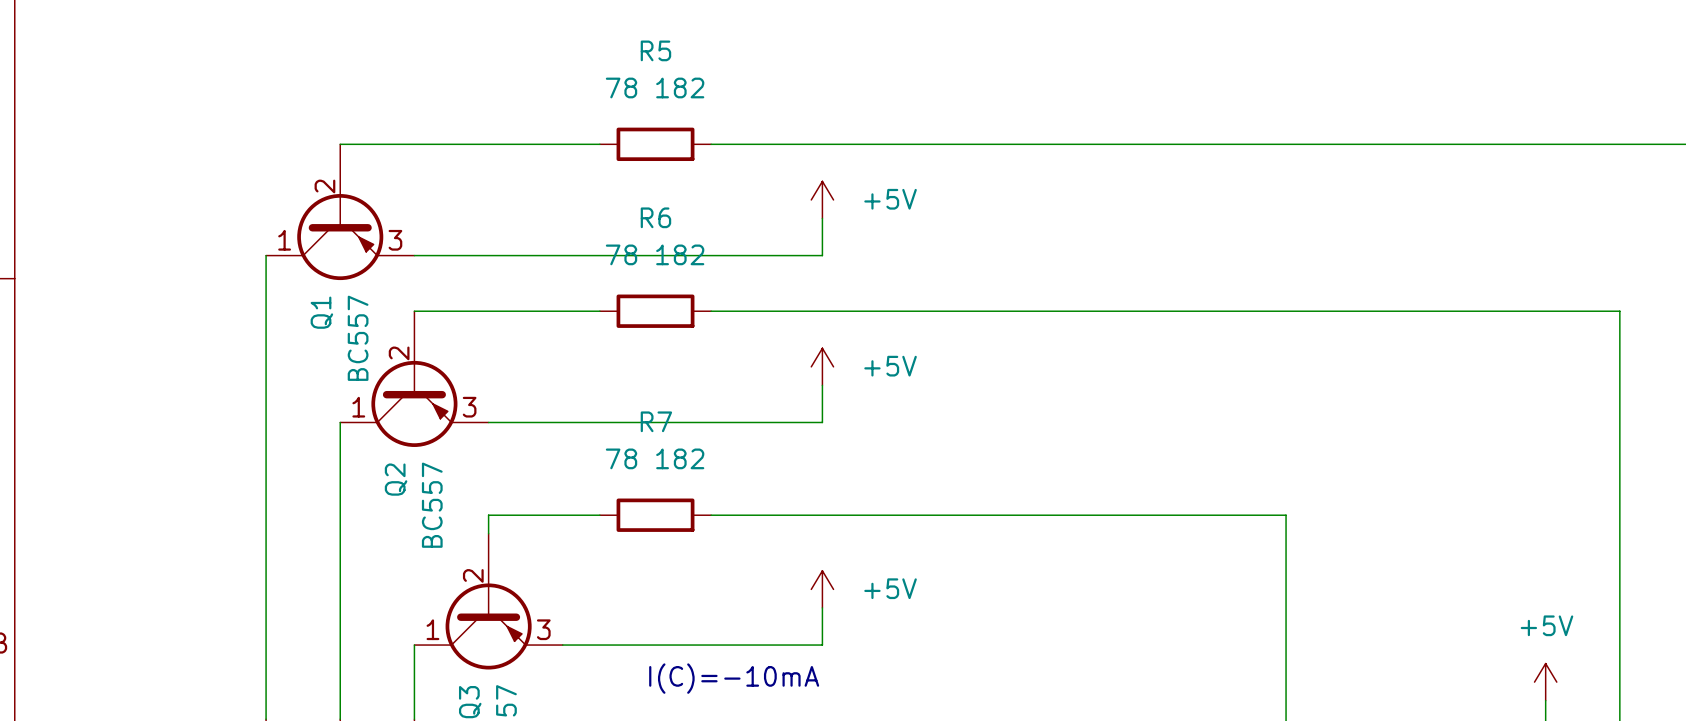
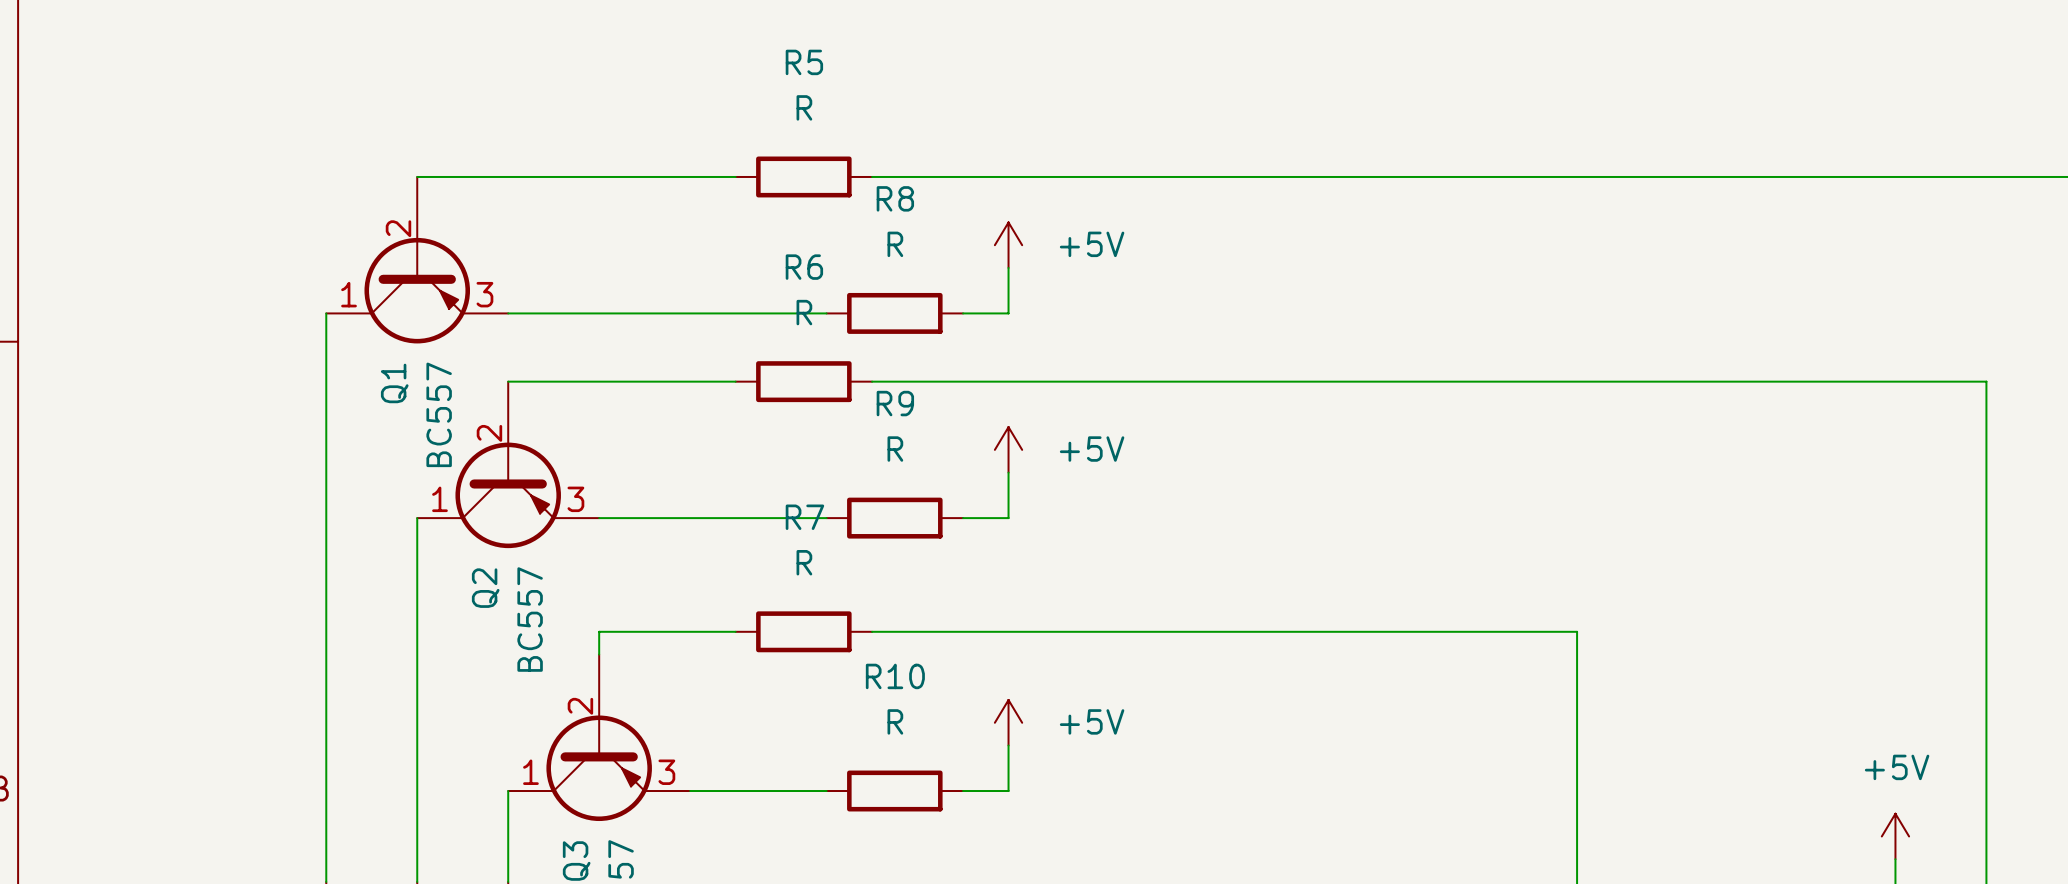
R5 value: 78 182 (655, 87) -> R (804, 107)
R6 value: 78 182 (655, 254) -> R (804, 312)
wire: (674, 255) (785, 255) -> none
R8: none -> R (894, 313)
wire: (674, 422) (785, 422) -> none
R9: none -> R (894, 518)
R7 value: 78 182 (655, 458) -> R (804, 562)
wire: (674, 645) (785, 645) -> none
R10: none -> R (894, 791)
text: I(C)=-10mA (734, 678) -> none

